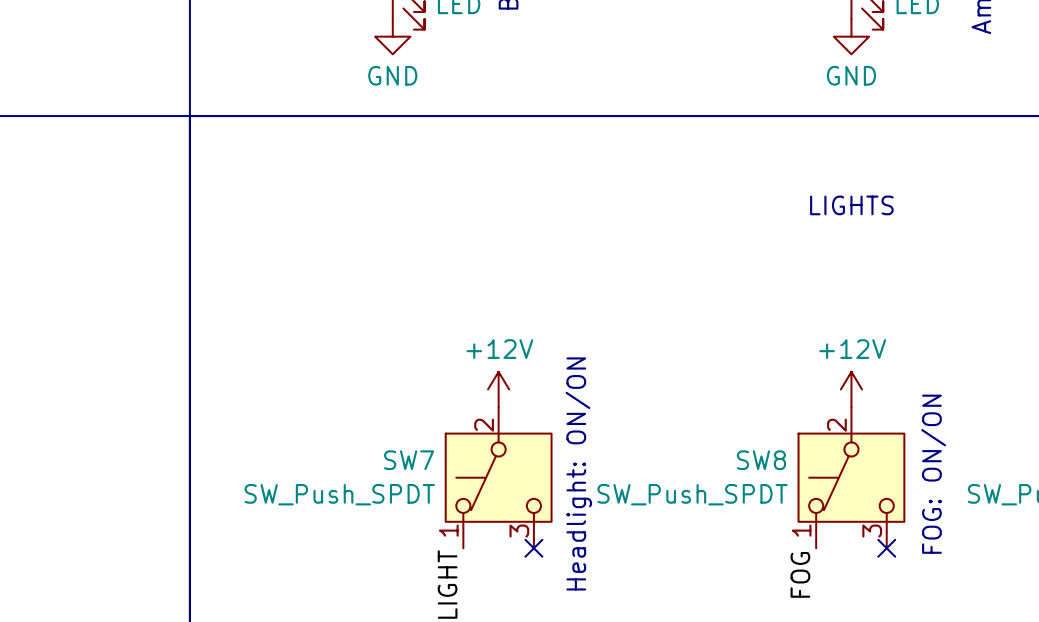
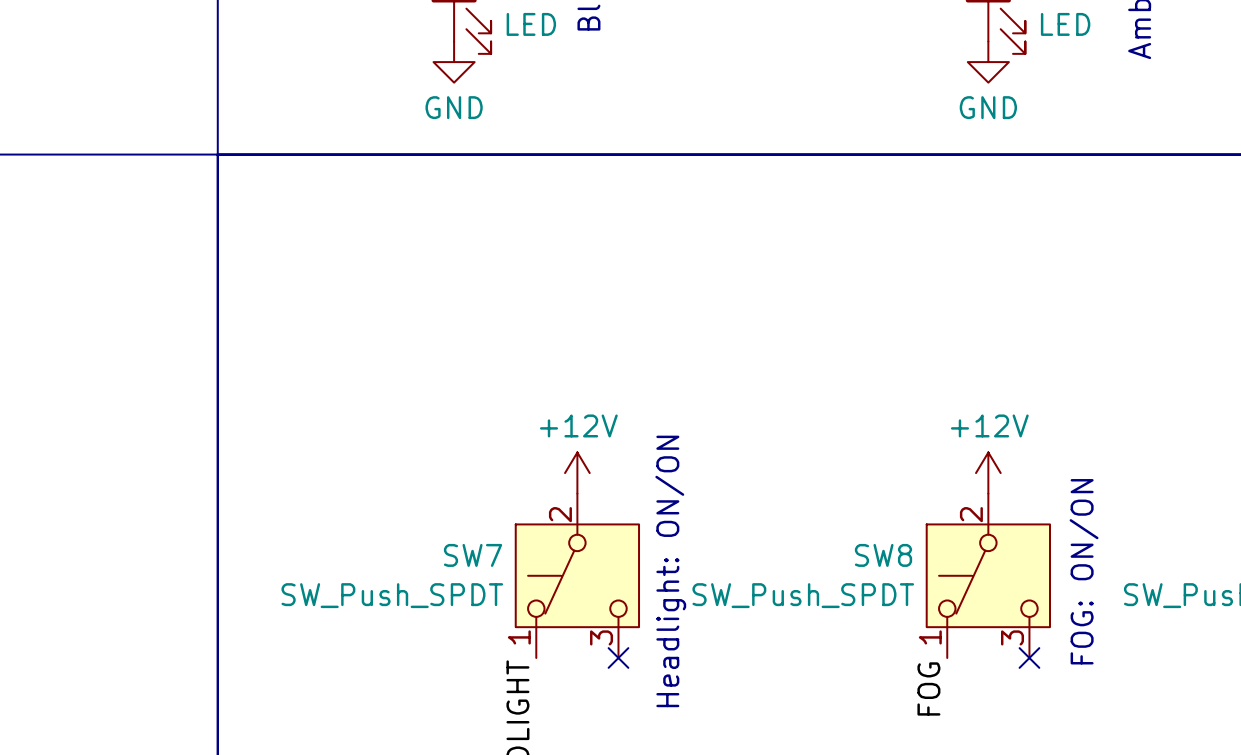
text: LIGHTS (851, 205) -> none

